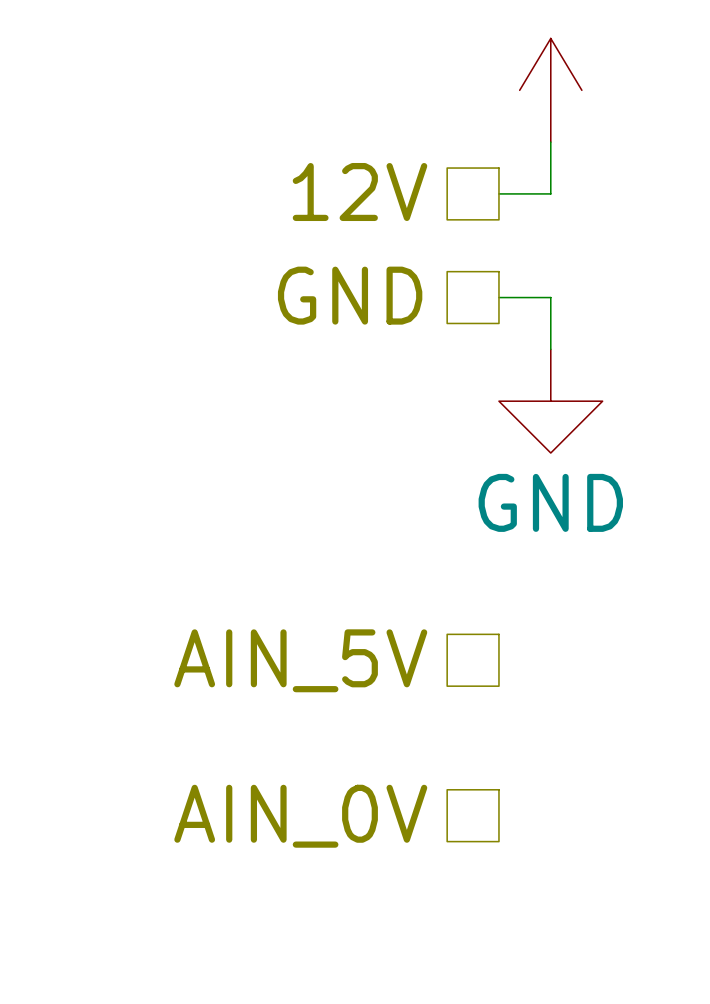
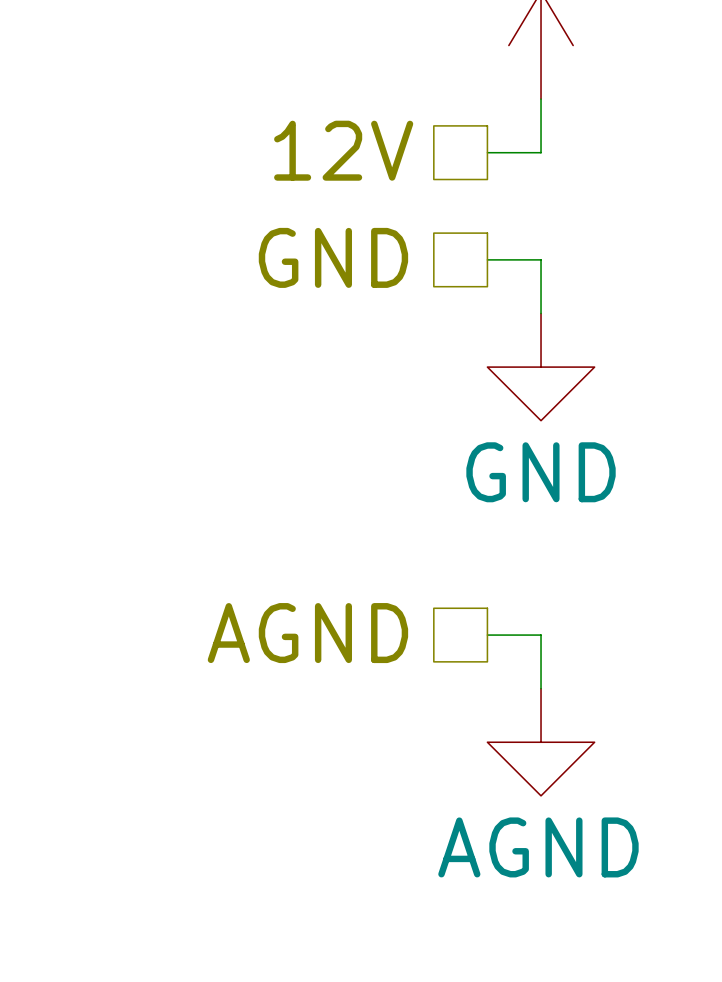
hierarchical label: AIN_5V (300, 660) -> AGND (307, 633)
wire: none -> (487, 635) (541, 635) (541, 688)
power symbol: none -> AGND (541, 742)
hierarchical label: AIN_0V (300, 816) -> none

